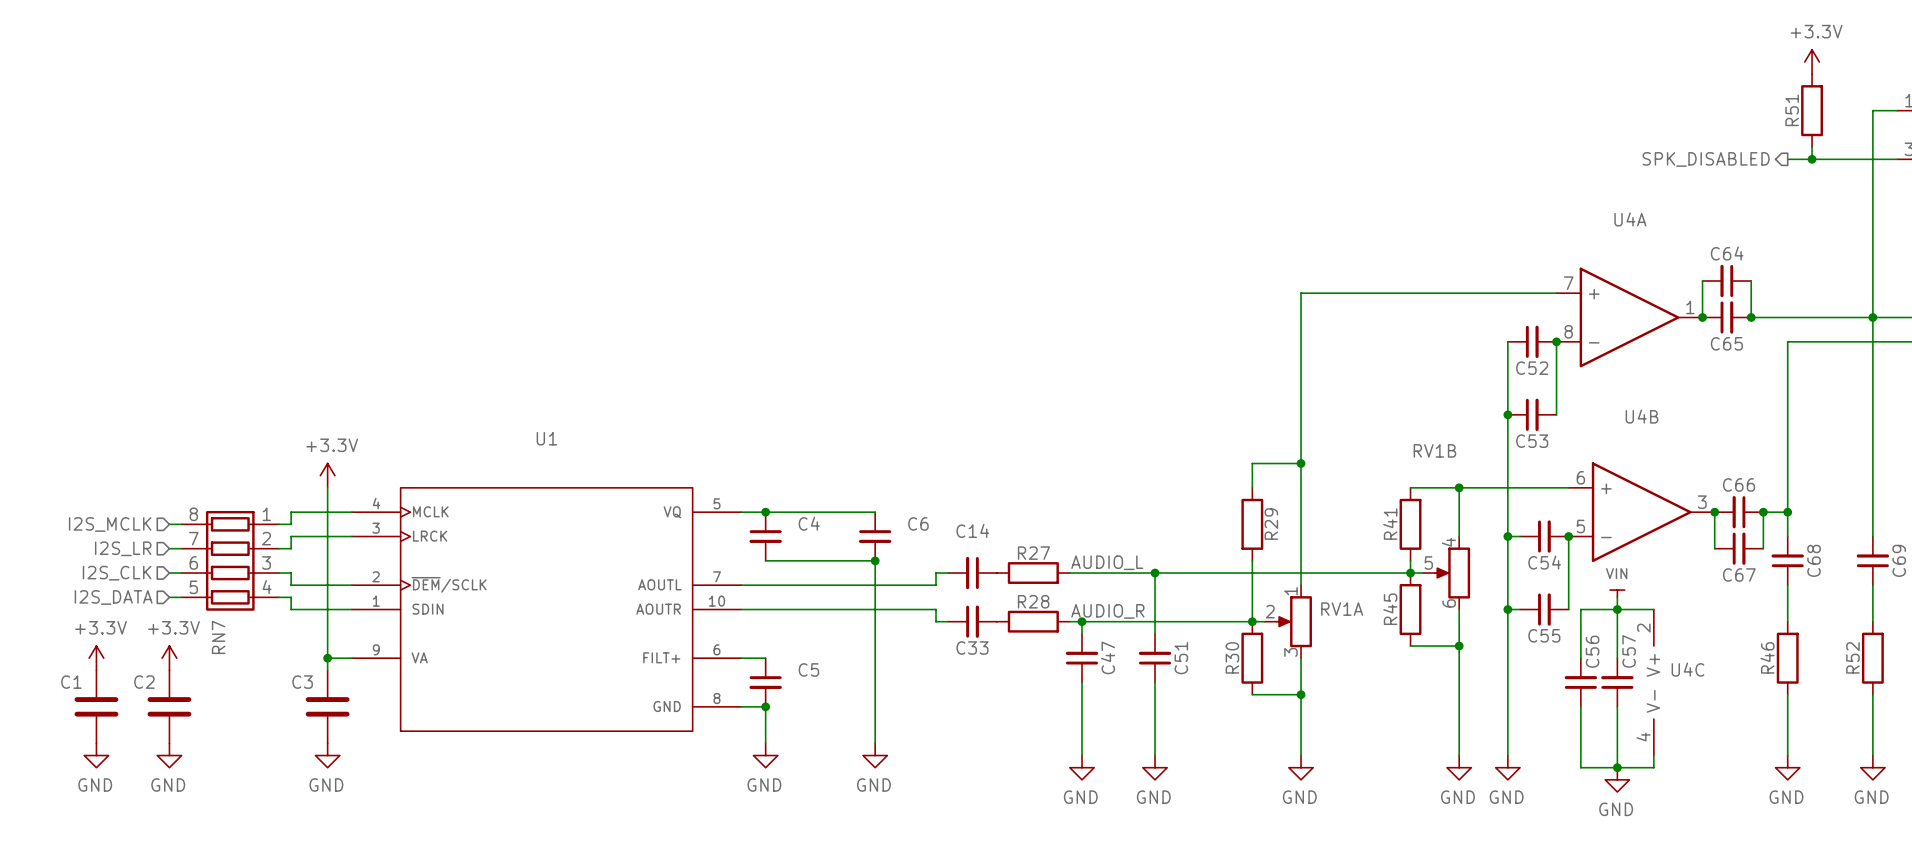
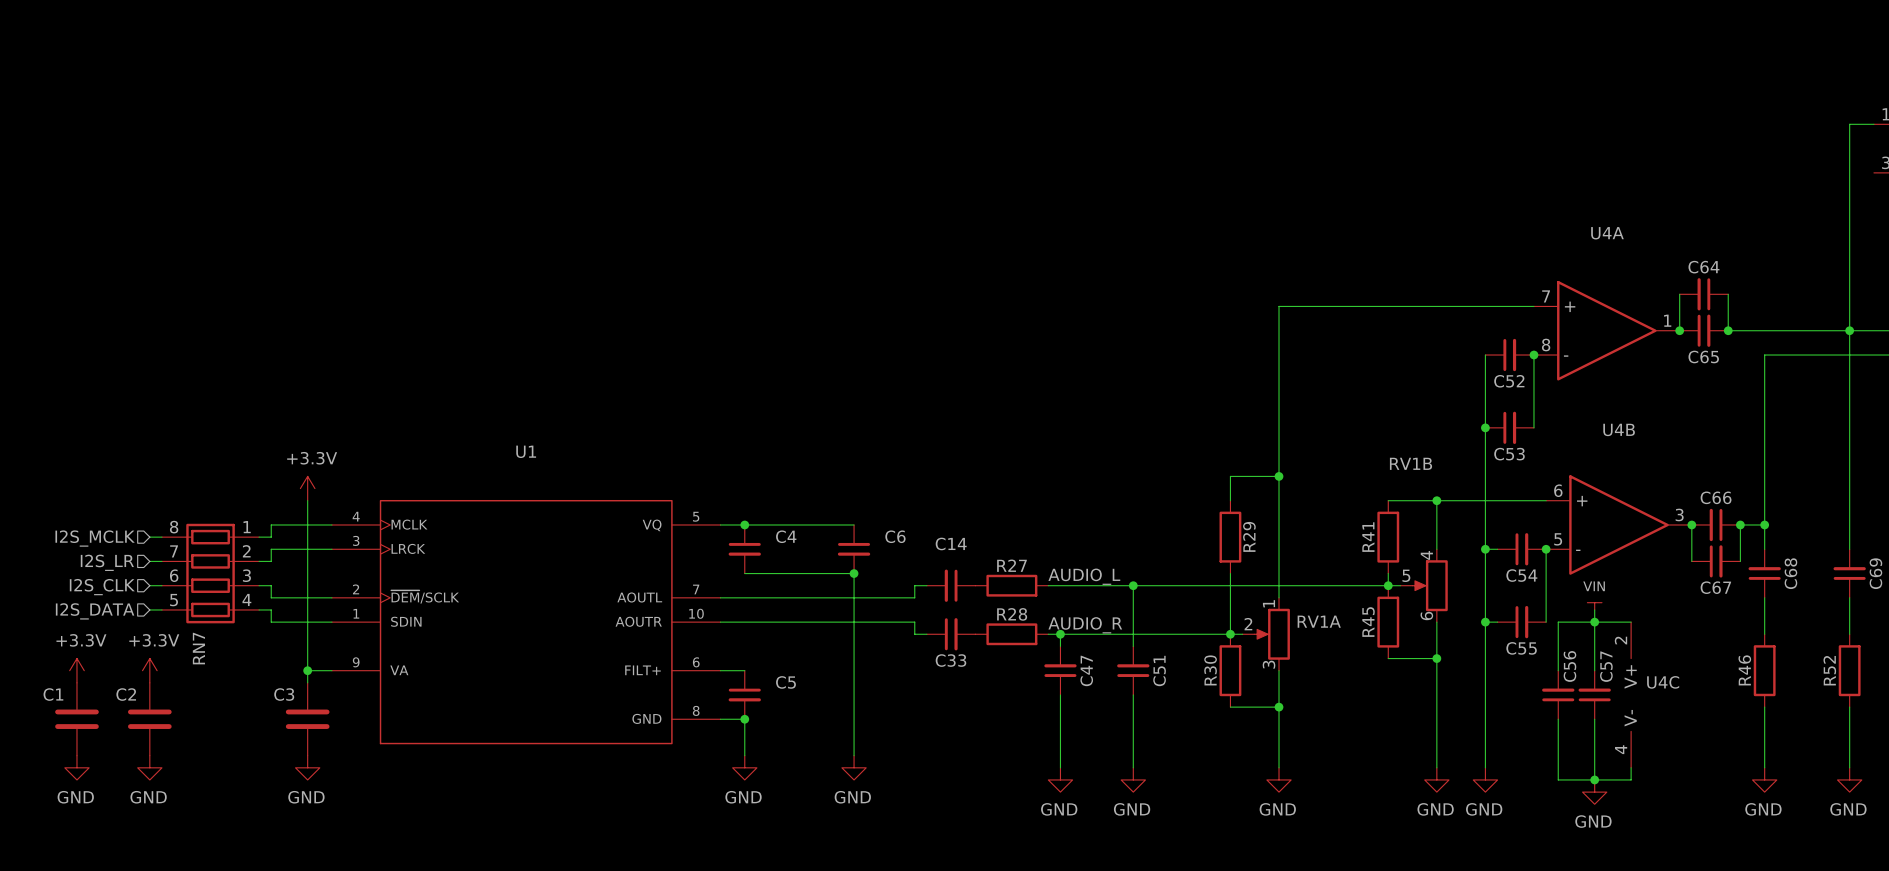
power symbol: +3.3V (1812, 61) -> none
R51: (1812, 110) -> none
wire: (1812, 147) (1812, 159) -> none
hierarchical label: SPK_DISABLED (1706, 159) -> none
wire: (1787, 159) (1897, 159) -> none
junction: (1812, 159) -> none

